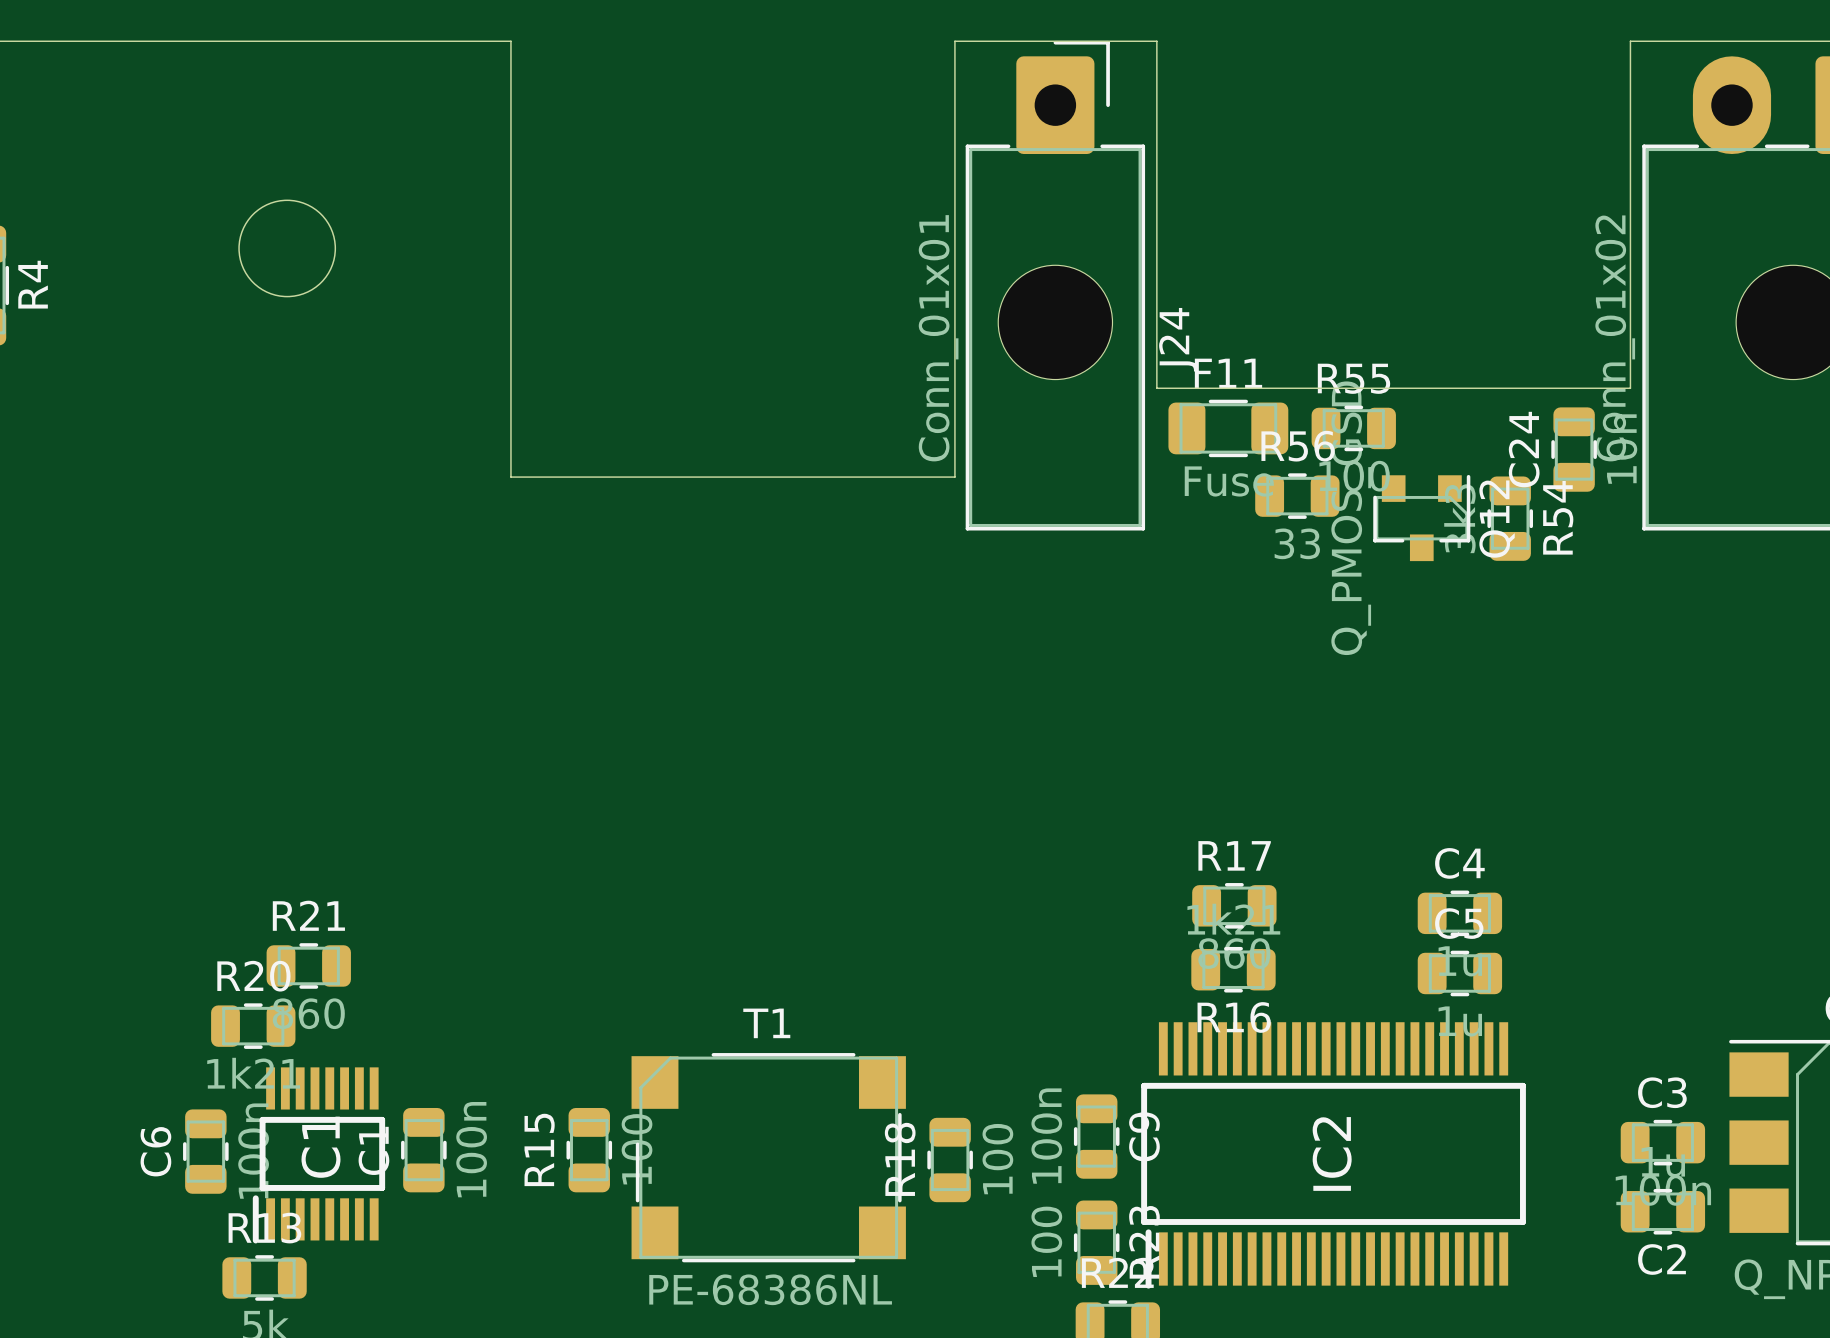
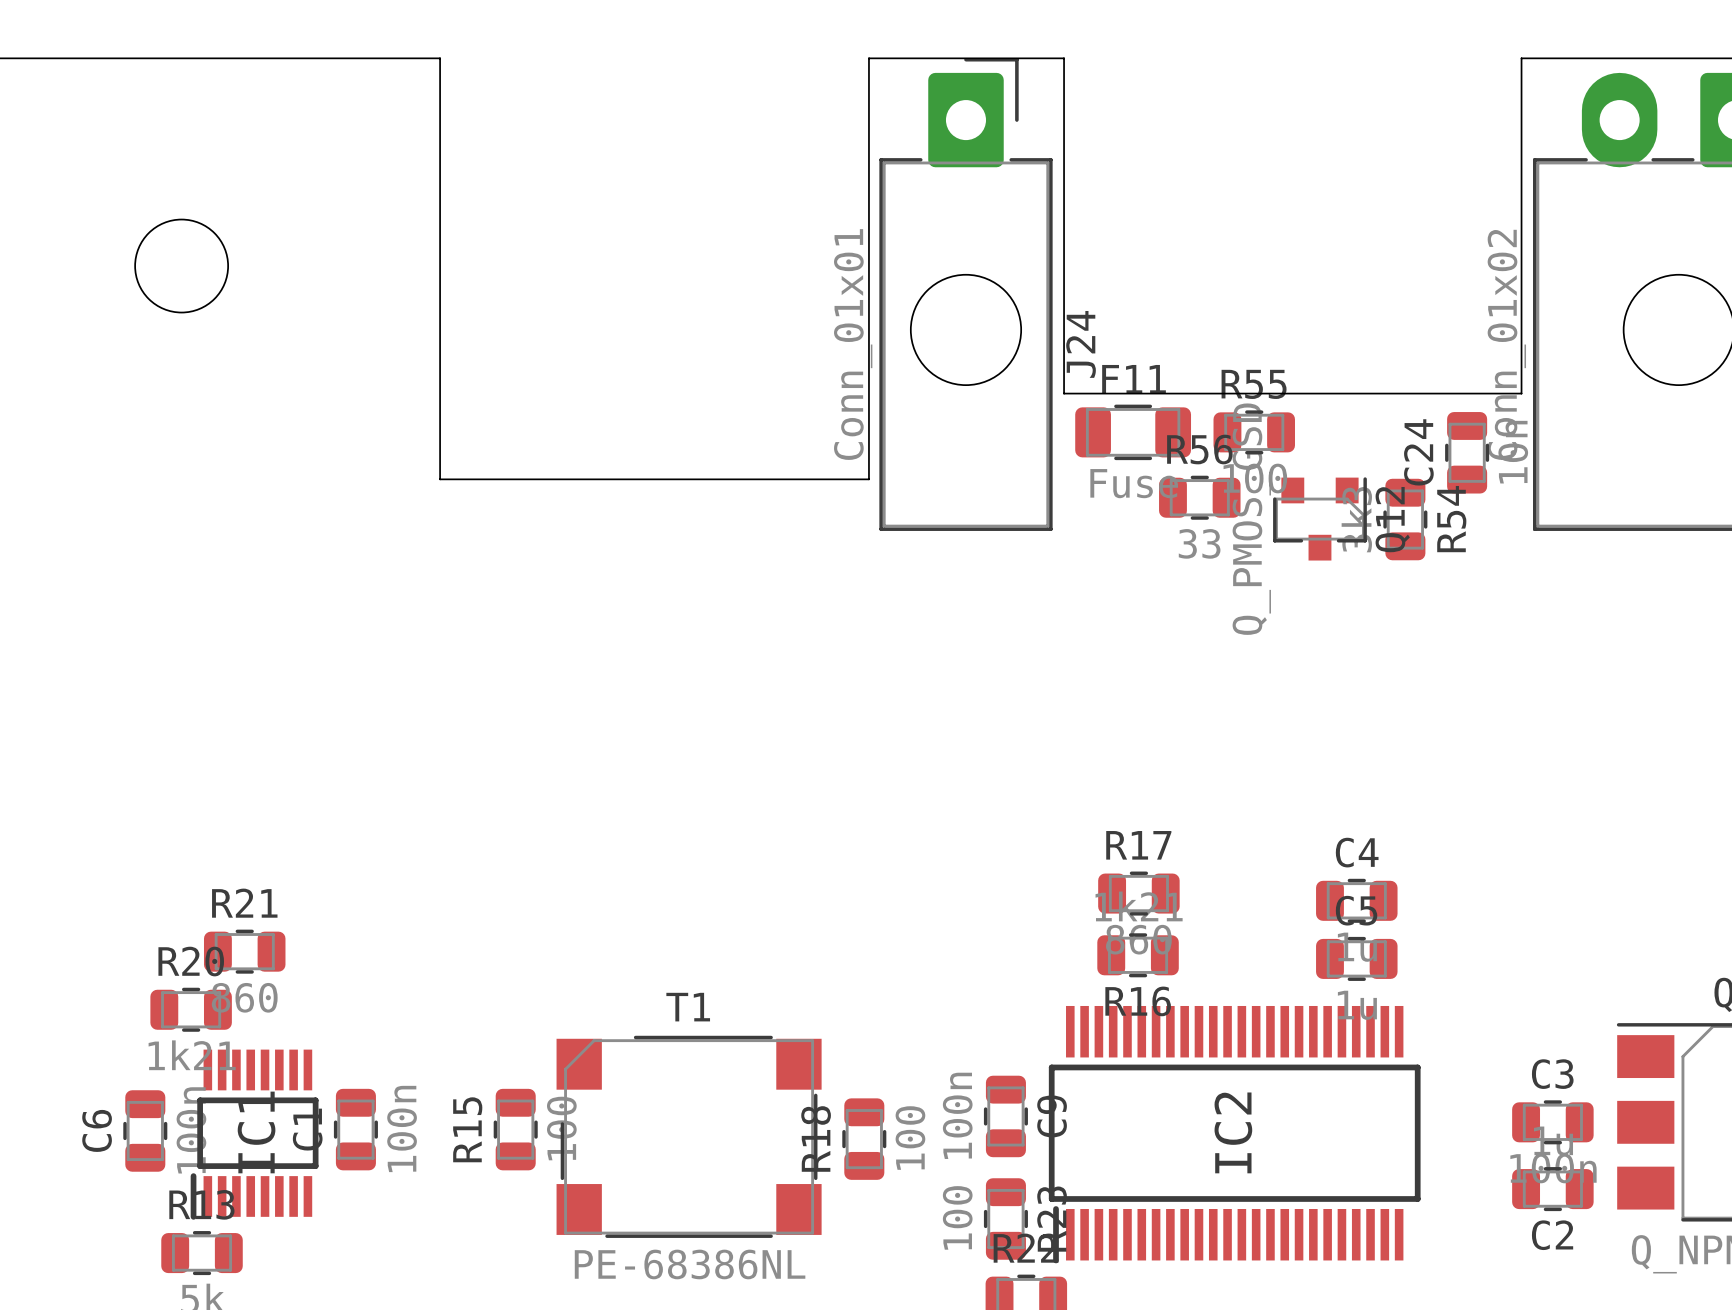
round board edge position: (287, 248) -> (181, 266)

